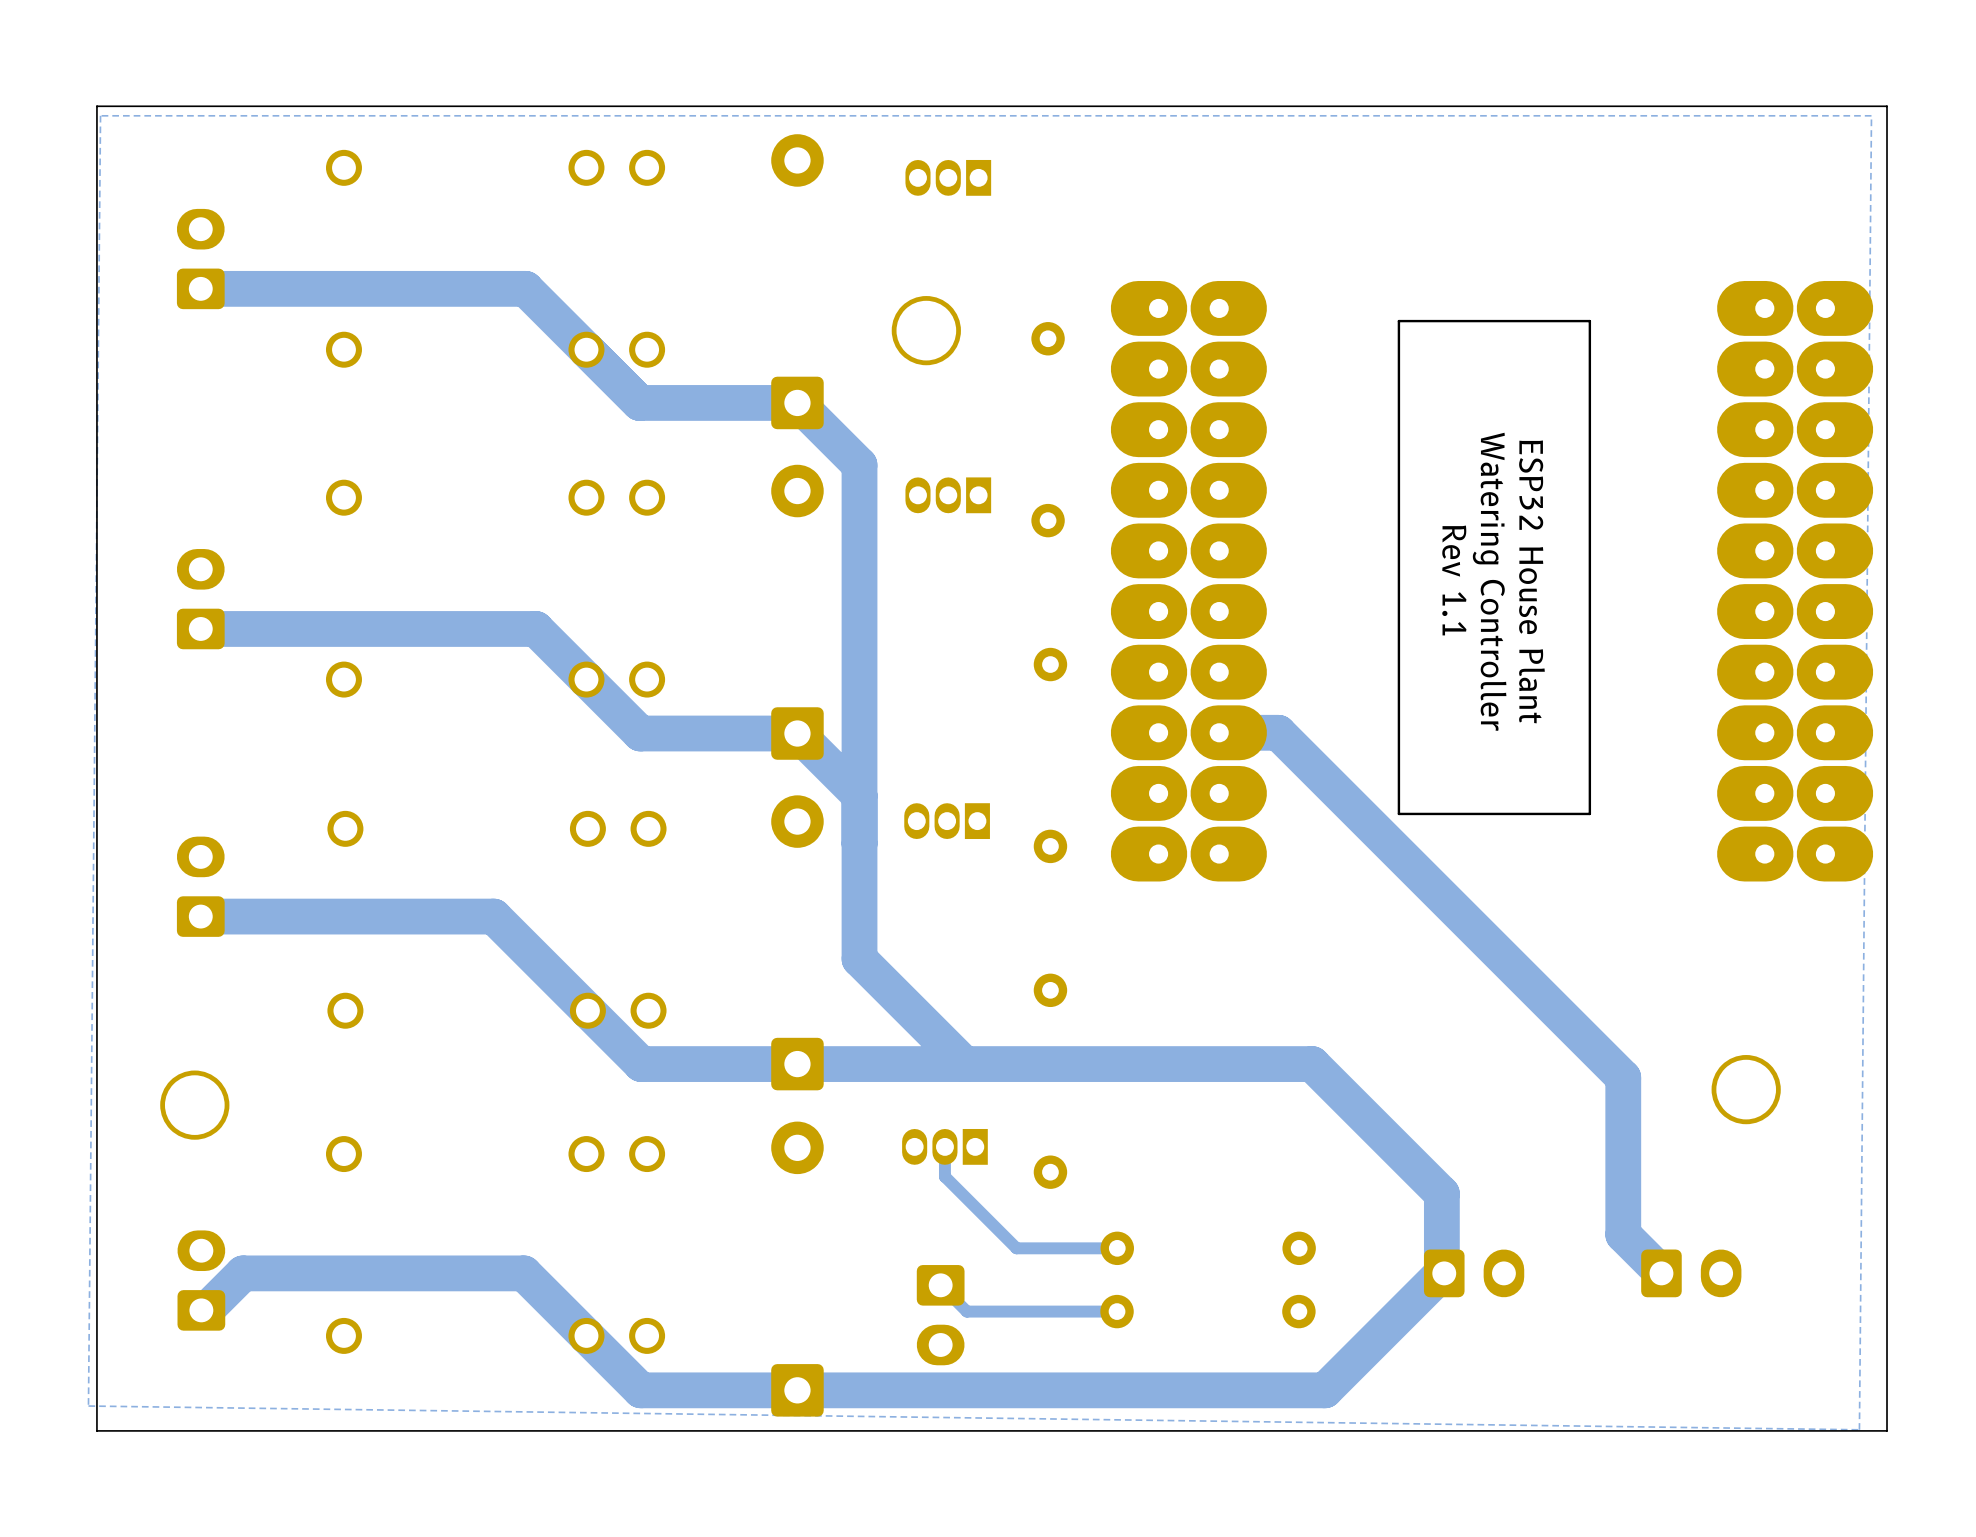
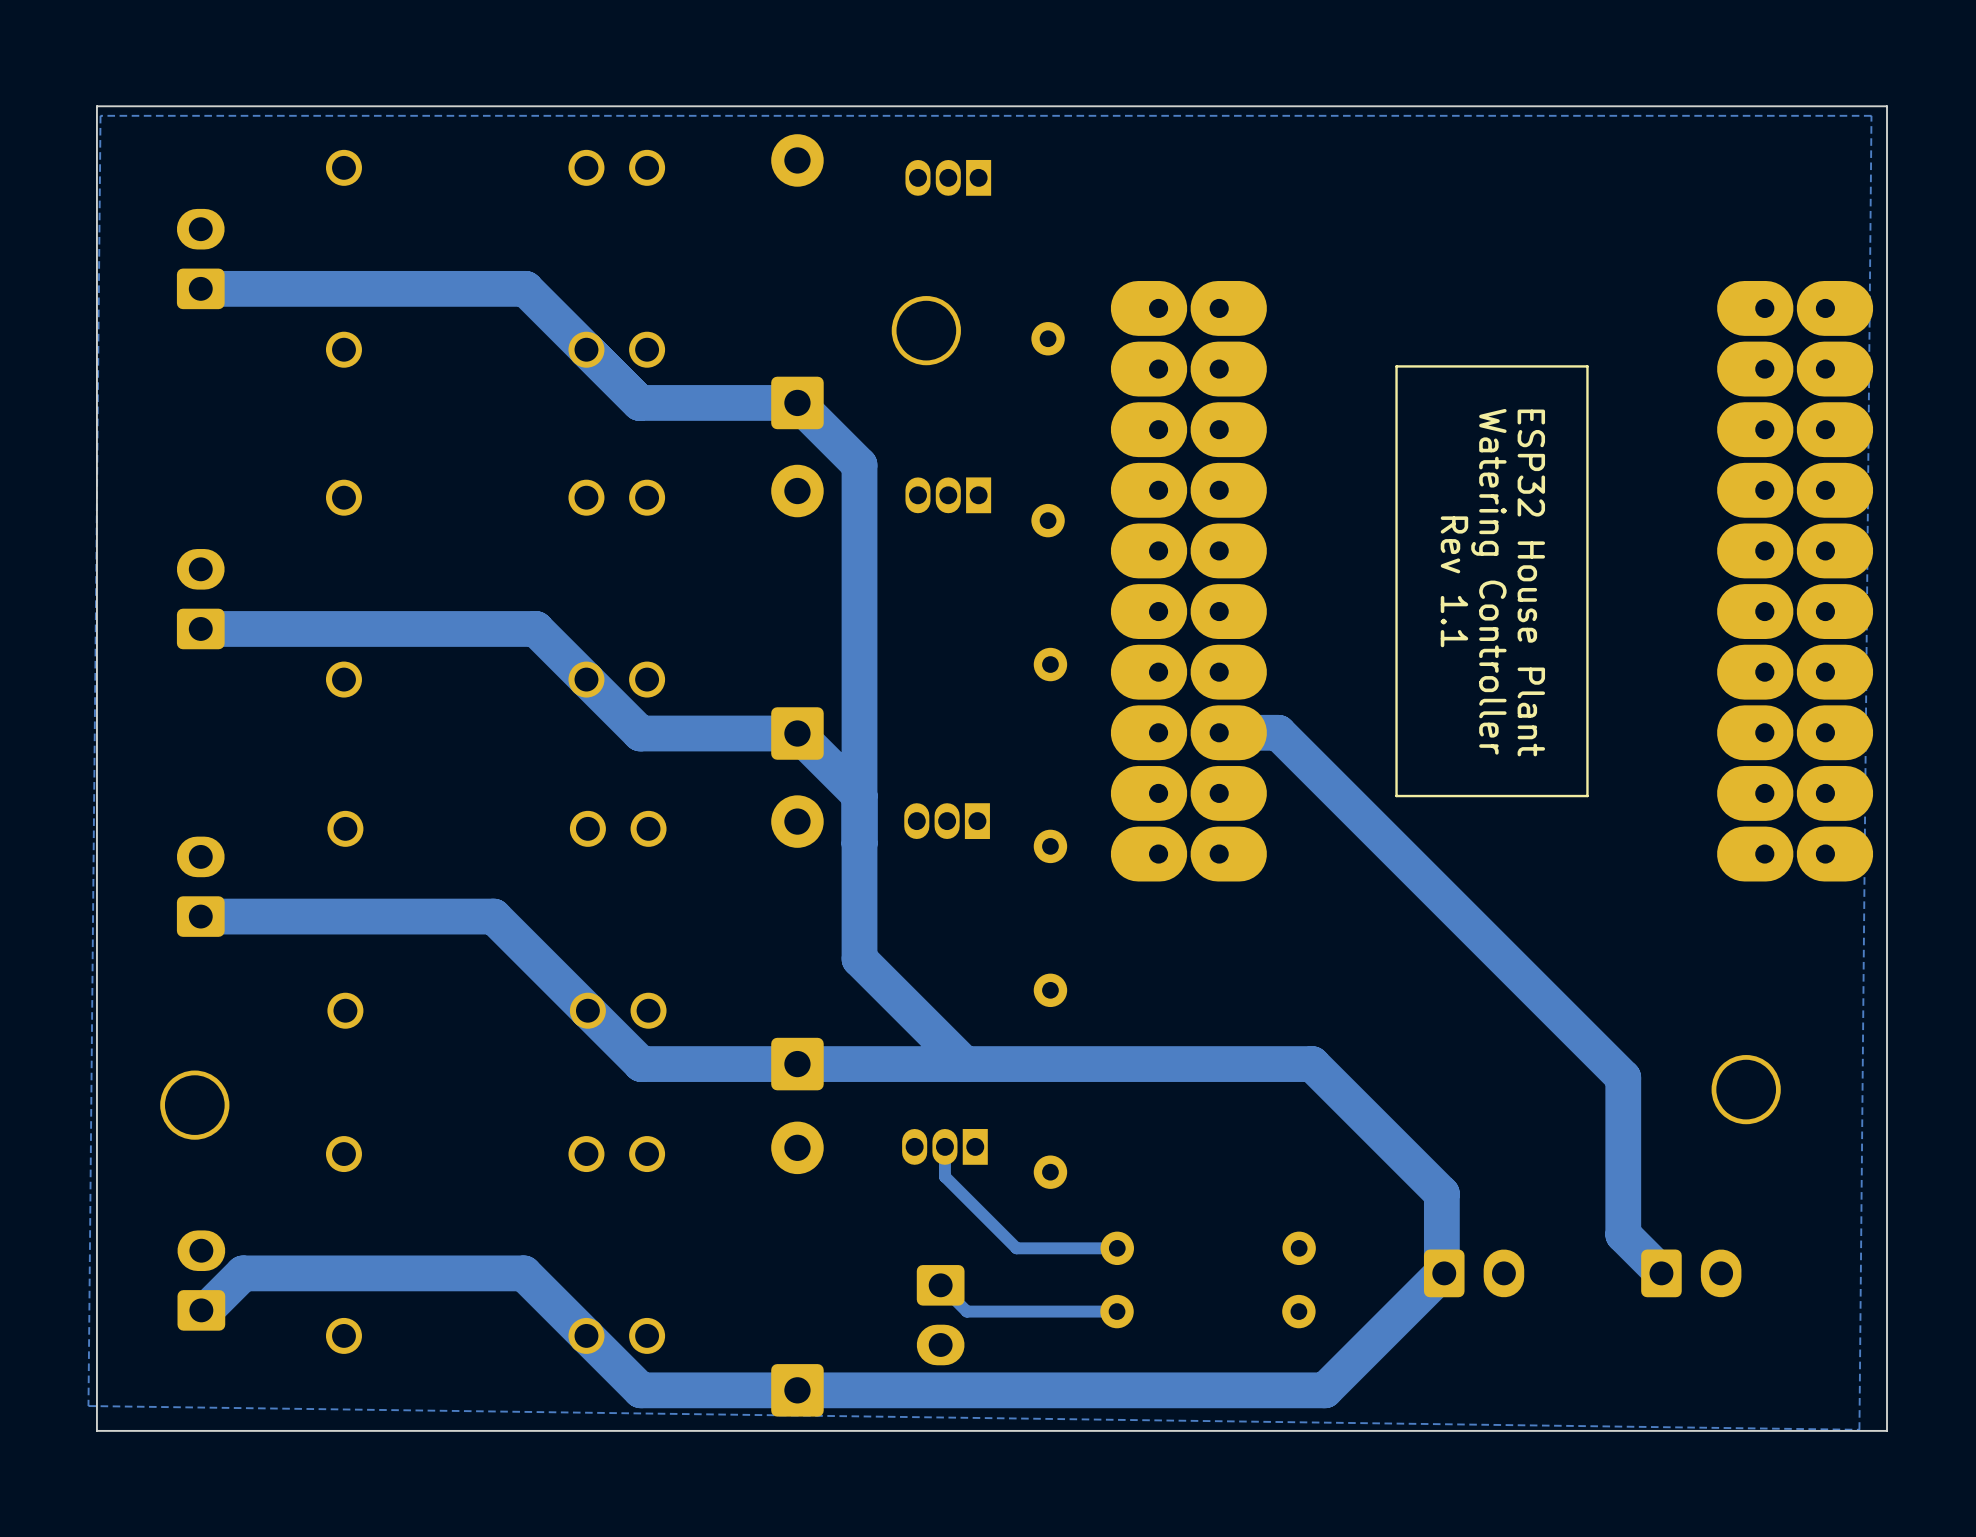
line: (1589, 321) (1398, 321) (1398, 813) (1589, 813) (1589, 321) -> (1587, 366) (1587, 796) (1396, 796) (1396, 366) (1587, 366)

